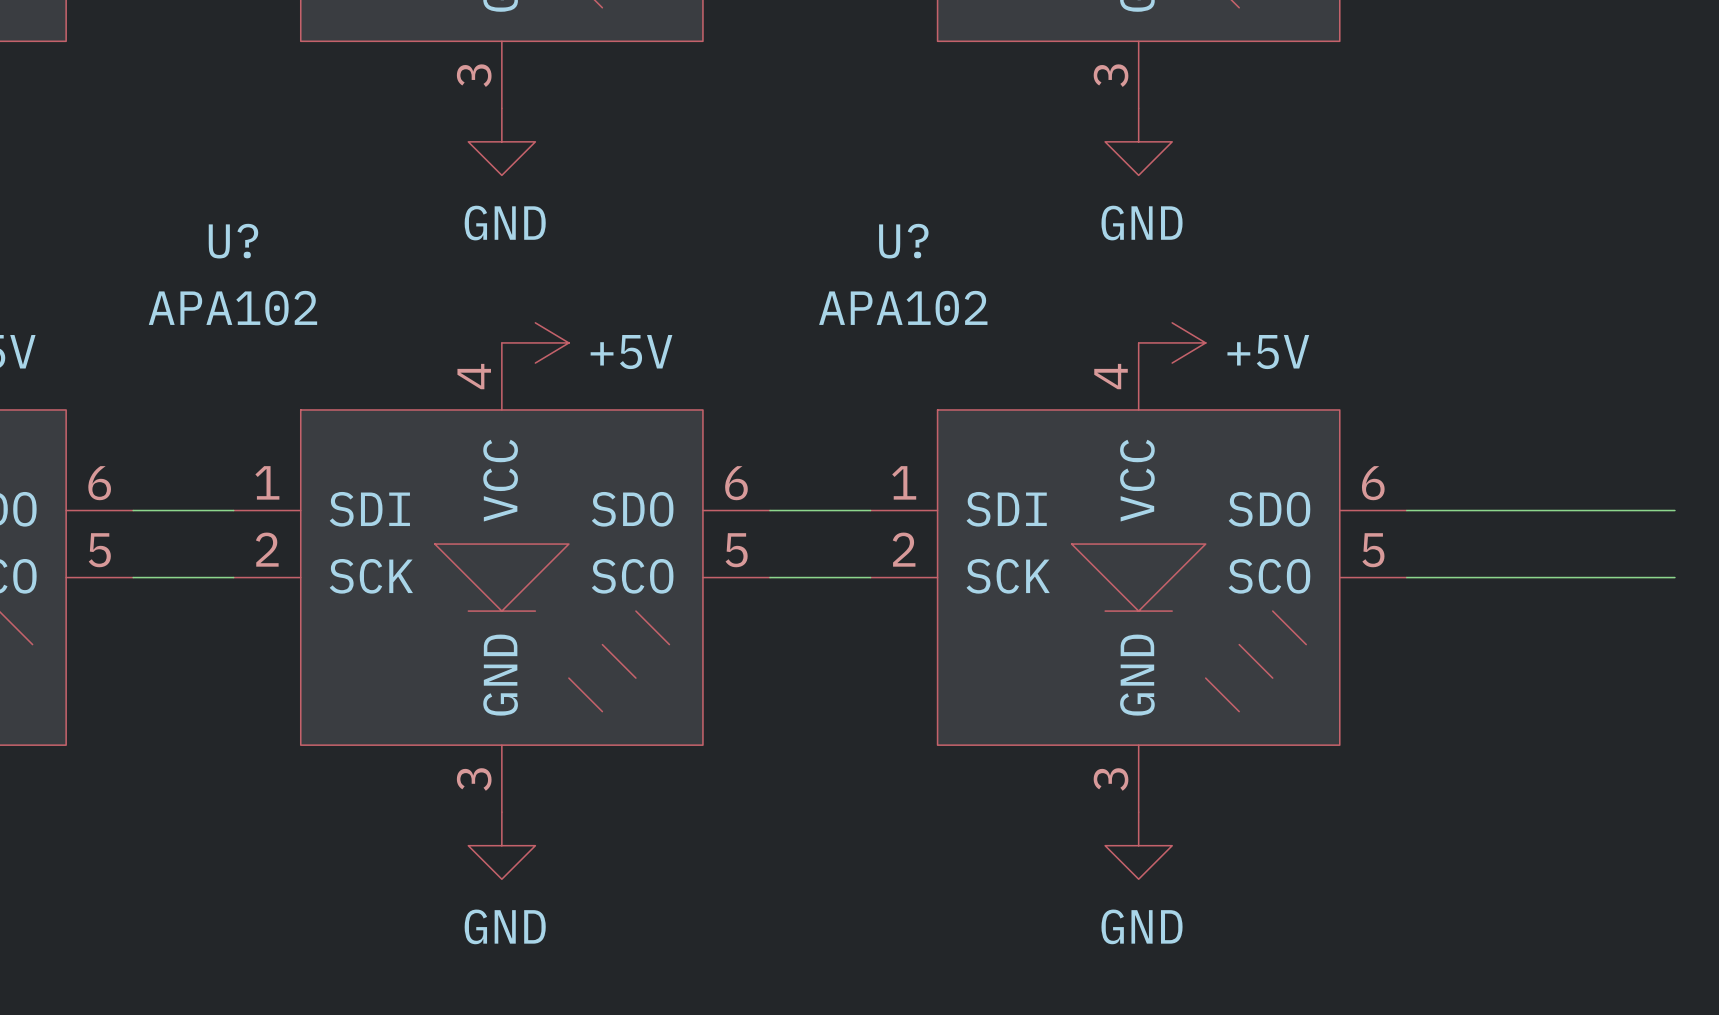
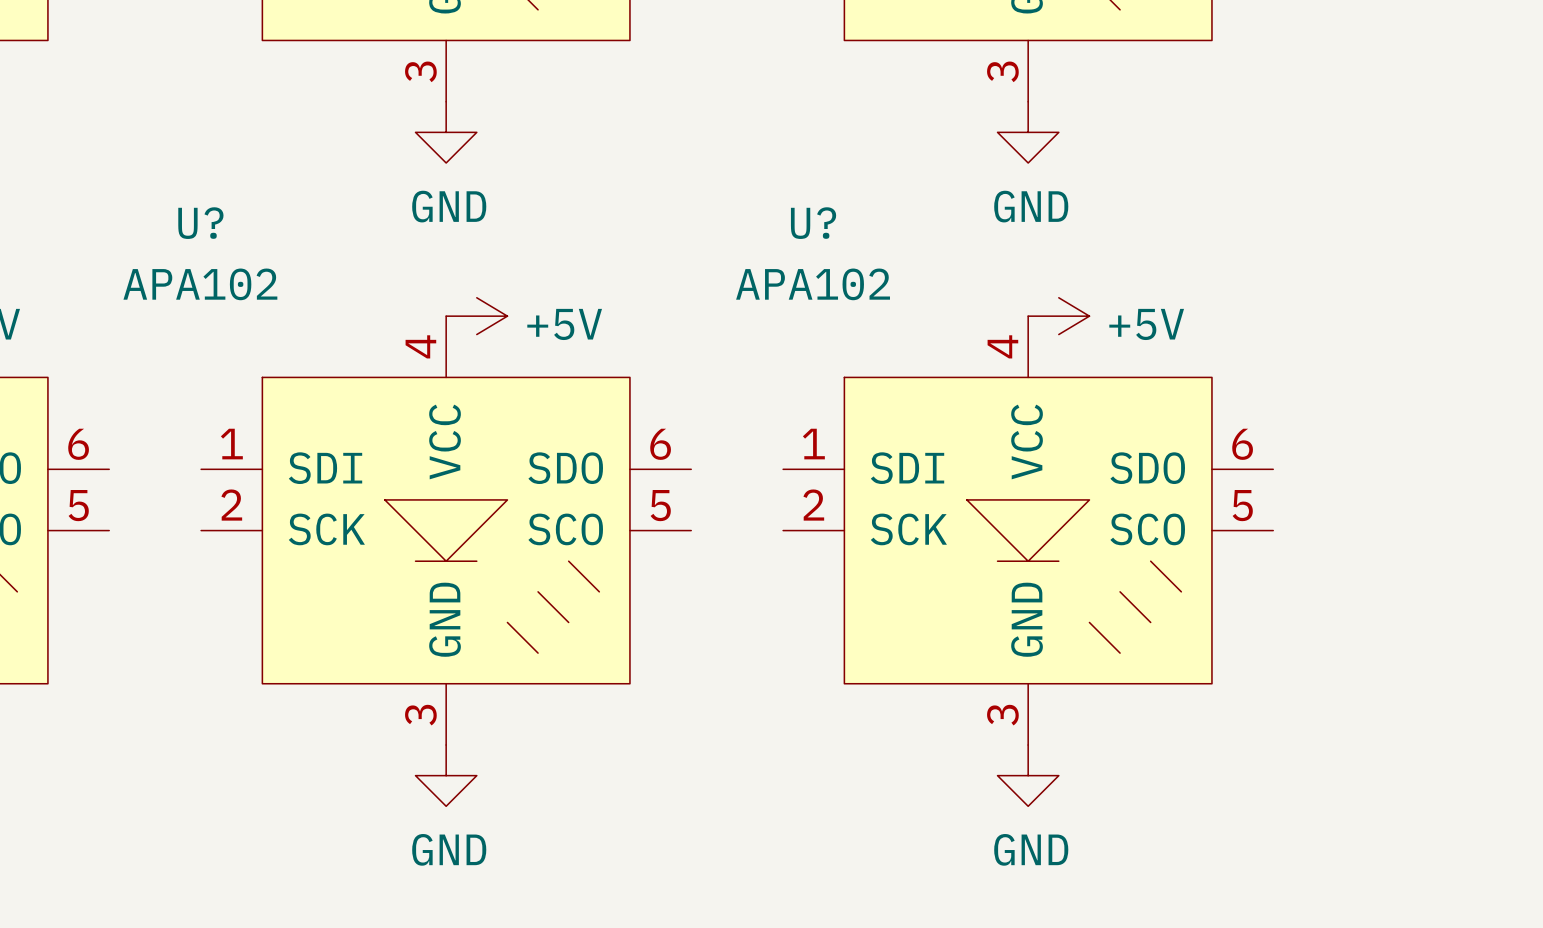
wire: (133, 510) (233, 510) -> none
wire: (769, 510) (870, 510) -> none
wire: (1406, 510) (1674, 510) -> none
wire: (133, 577) (233, 577) -> none
wire: (769, 577) (870, 577) -> none
wire: (1406, 577) (1674, 577) -> none

